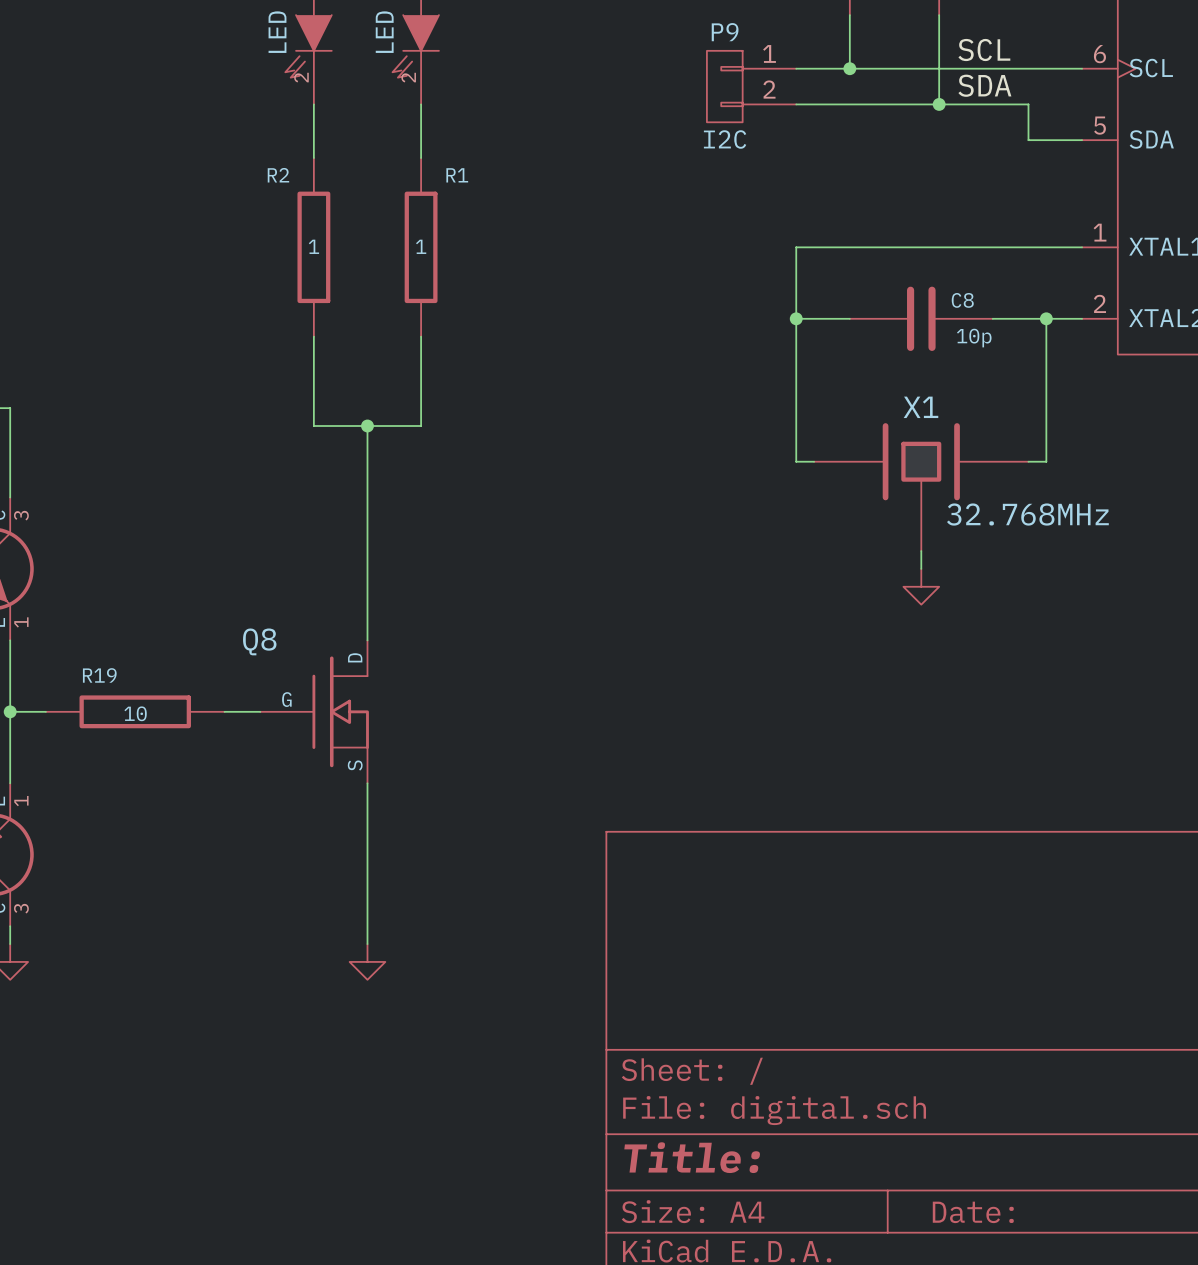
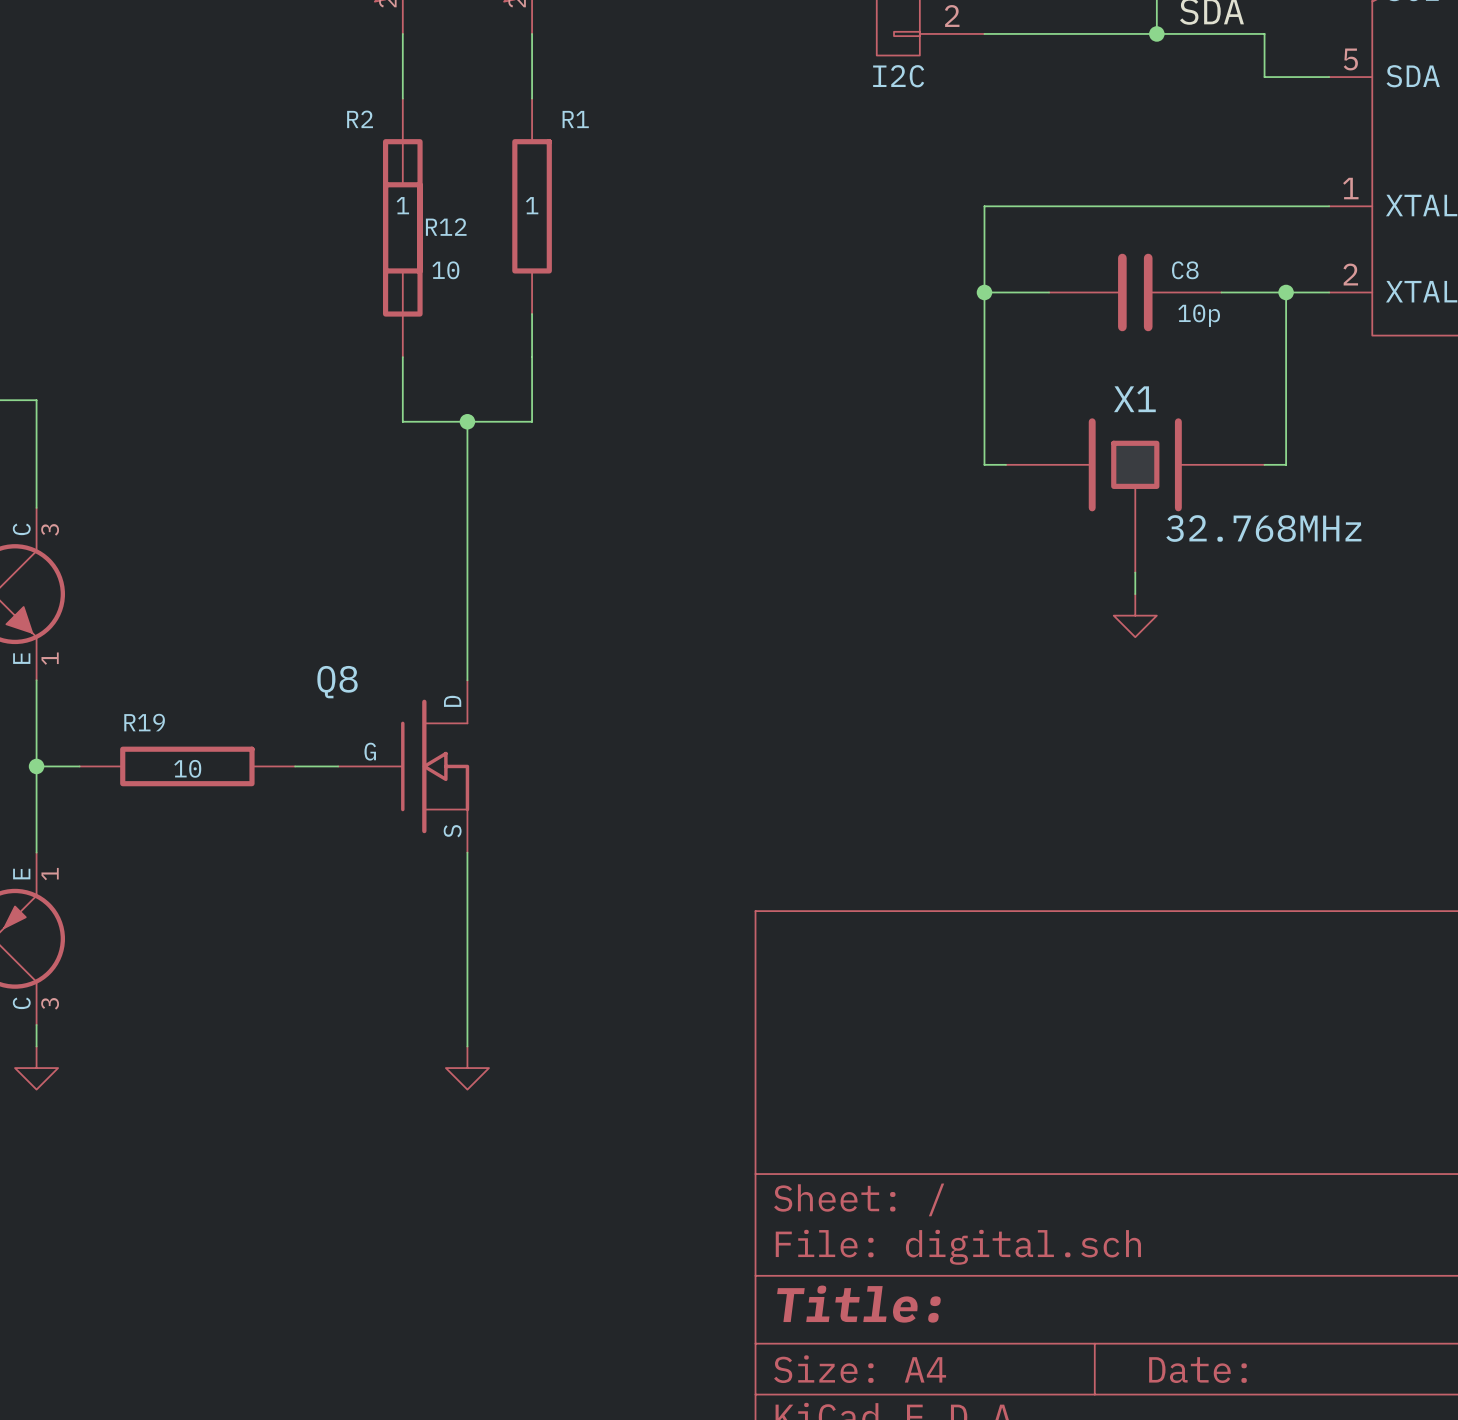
R12: none -> 10 (402, 249)

